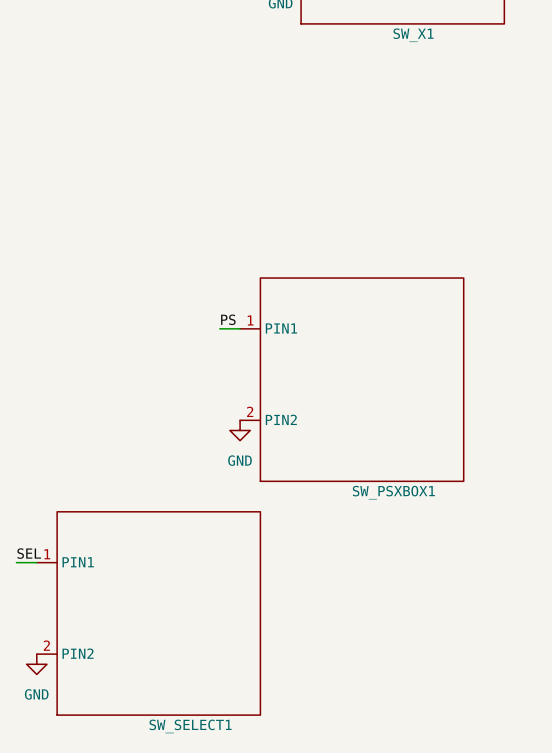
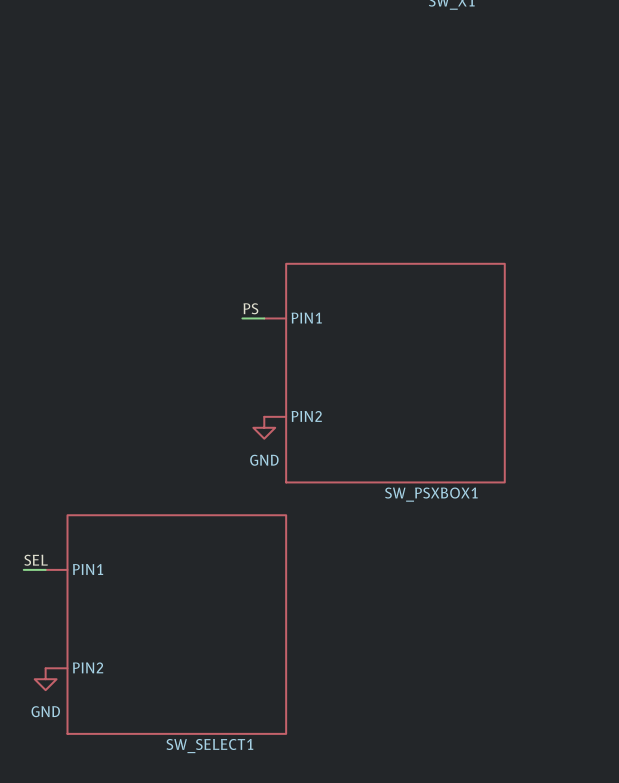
SW_PSXBOX1 pin number: 1 (250, 320) -> none
SW_PSXBOX1 pin number: 2 (250, 411) -> none
SW_SELECT1 pin number: 1 (47, 554) -> none
SW_SELECT1 pin number: 2 (46, 645) -> none

